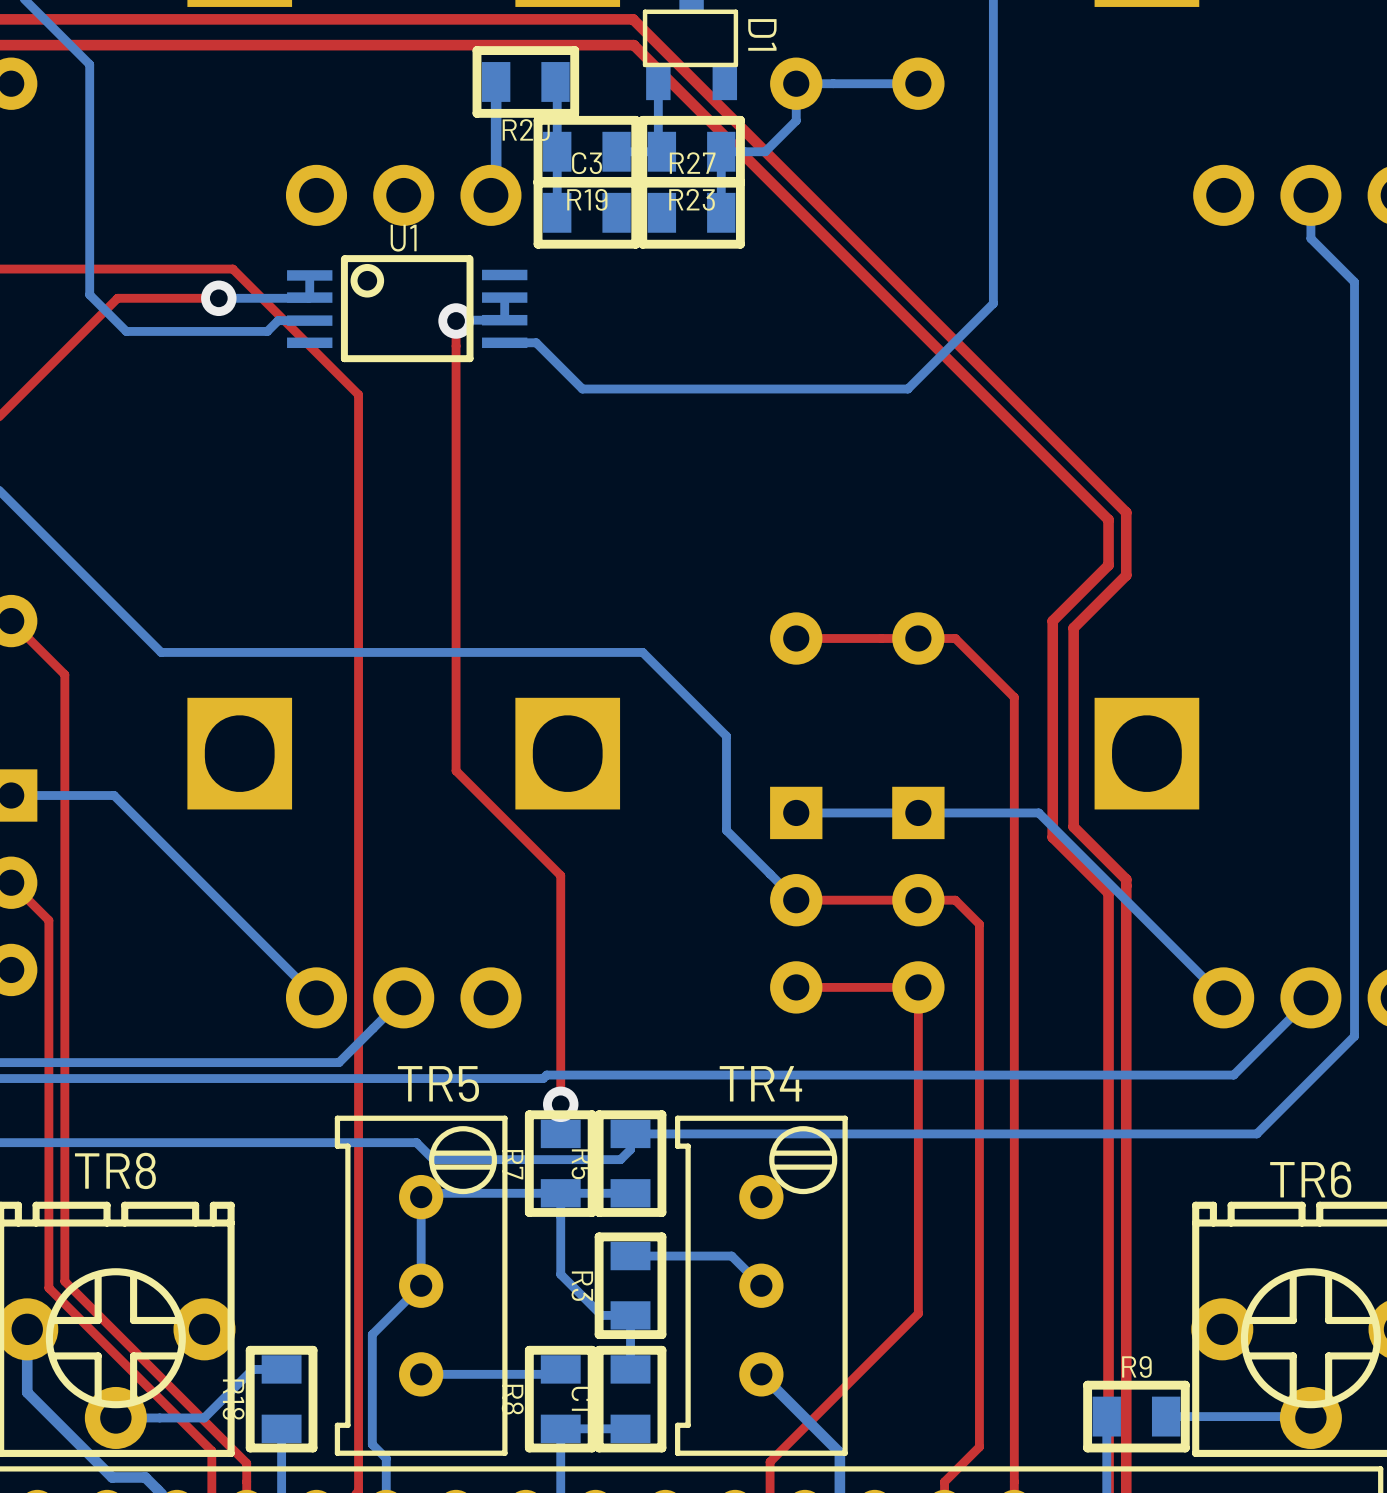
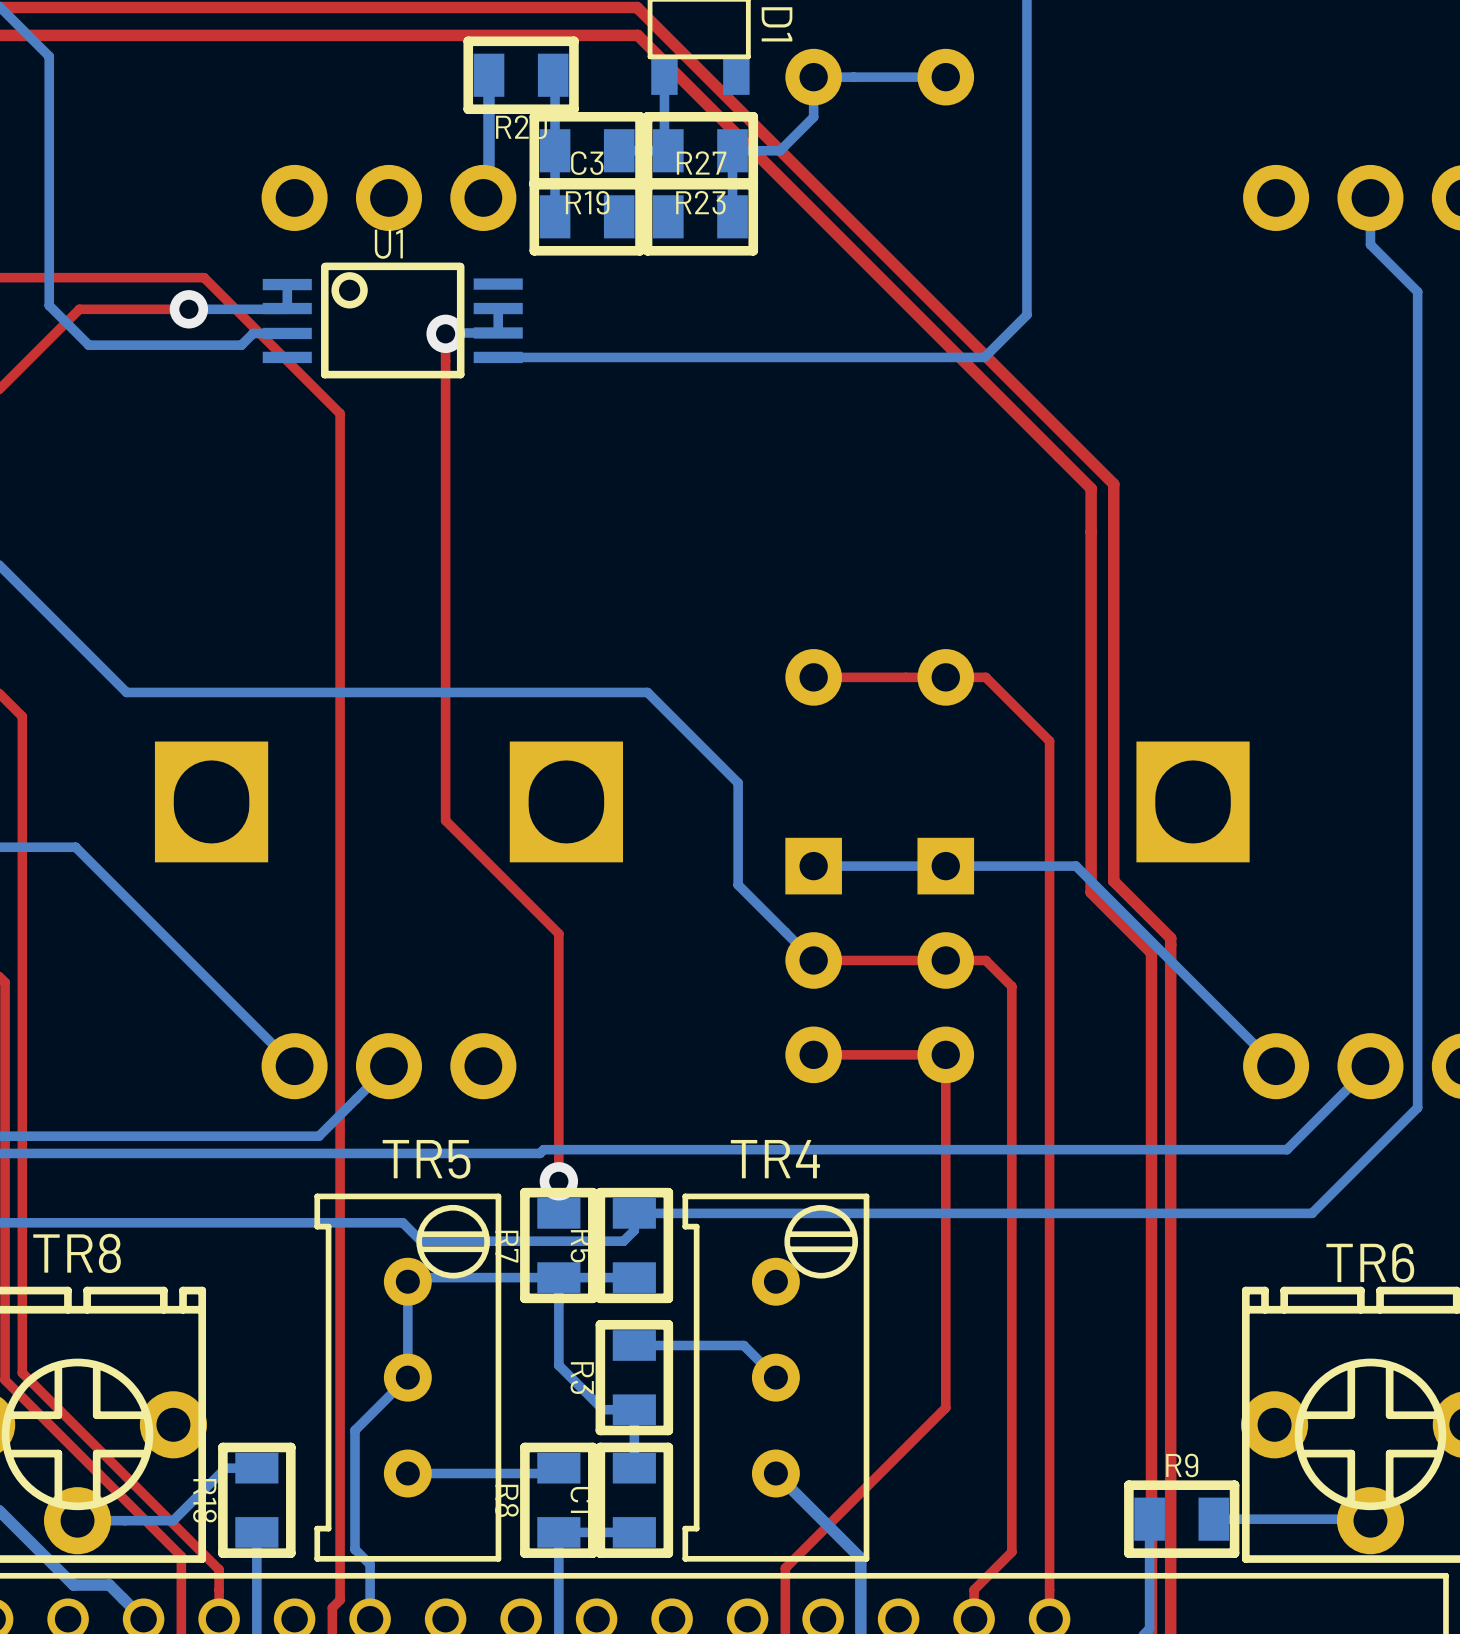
bottom track: (954, 342) (907, 389) (582, 389) (536, 342) -> (984, 357) (532, 357)
top track: (1073, 459) (1126, 512) (1126, 575) (1073, 628) -> (1113, 484) (1113, 666)
top track: (1052, 464) (1108, 519) (1108, 565) (1052, 621) -> (1091, 488) (1091, 658)

